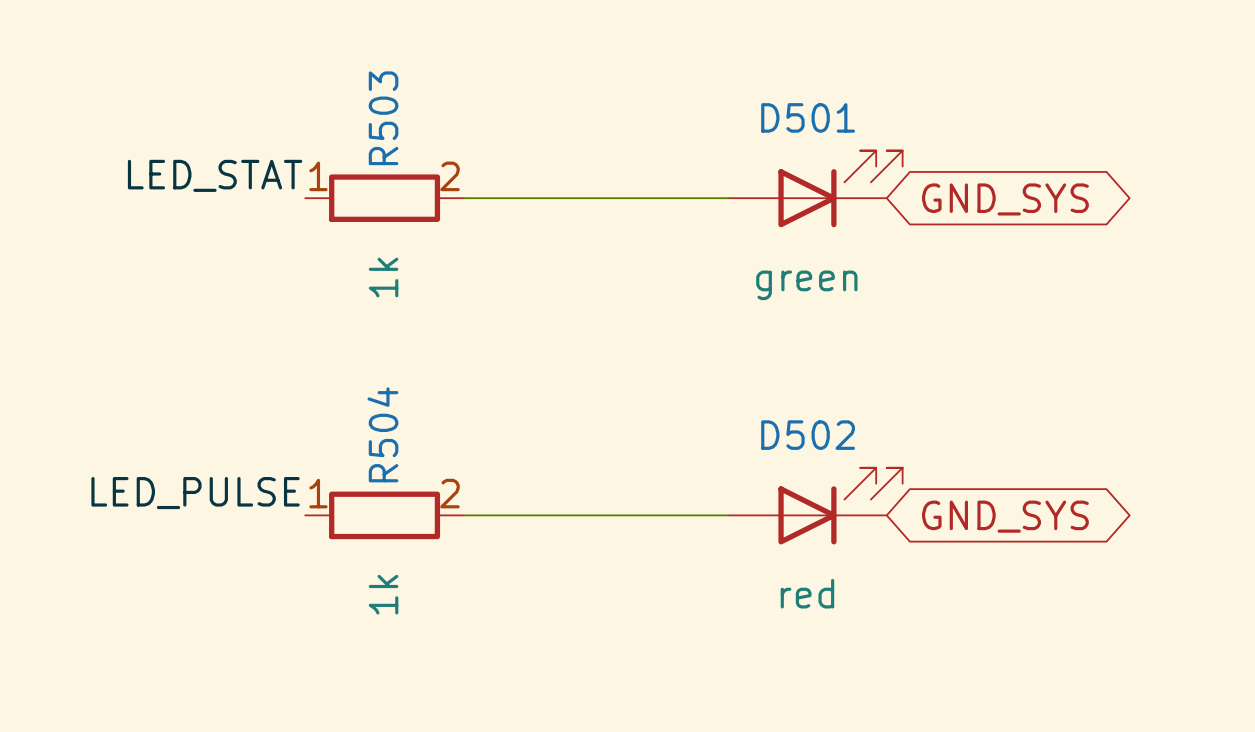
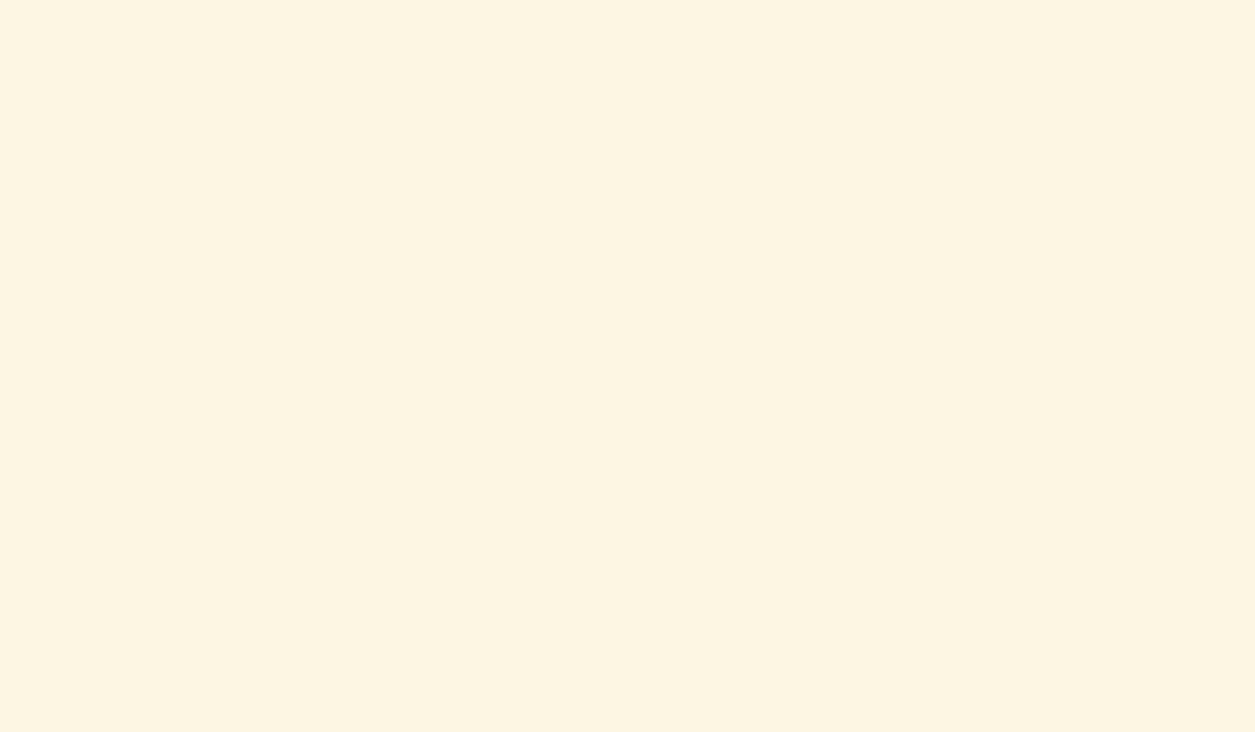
label: LED_STAT (215, 175) -> none
D501: green (815, 188) -> none
R503: 1k (384, 198) -> none
wire: (463, 198) (728, 198) -> none
global label: GND_SYS (1005, 199) -> none
label: LED_PULSE (195, 493) -> none
D502: red (815, 506) -> none
R504: 1k (384, 515) -> none
wire: (463, 515) (728, 515) -> none
global label: GND_SYS (1005, 516) -> none

